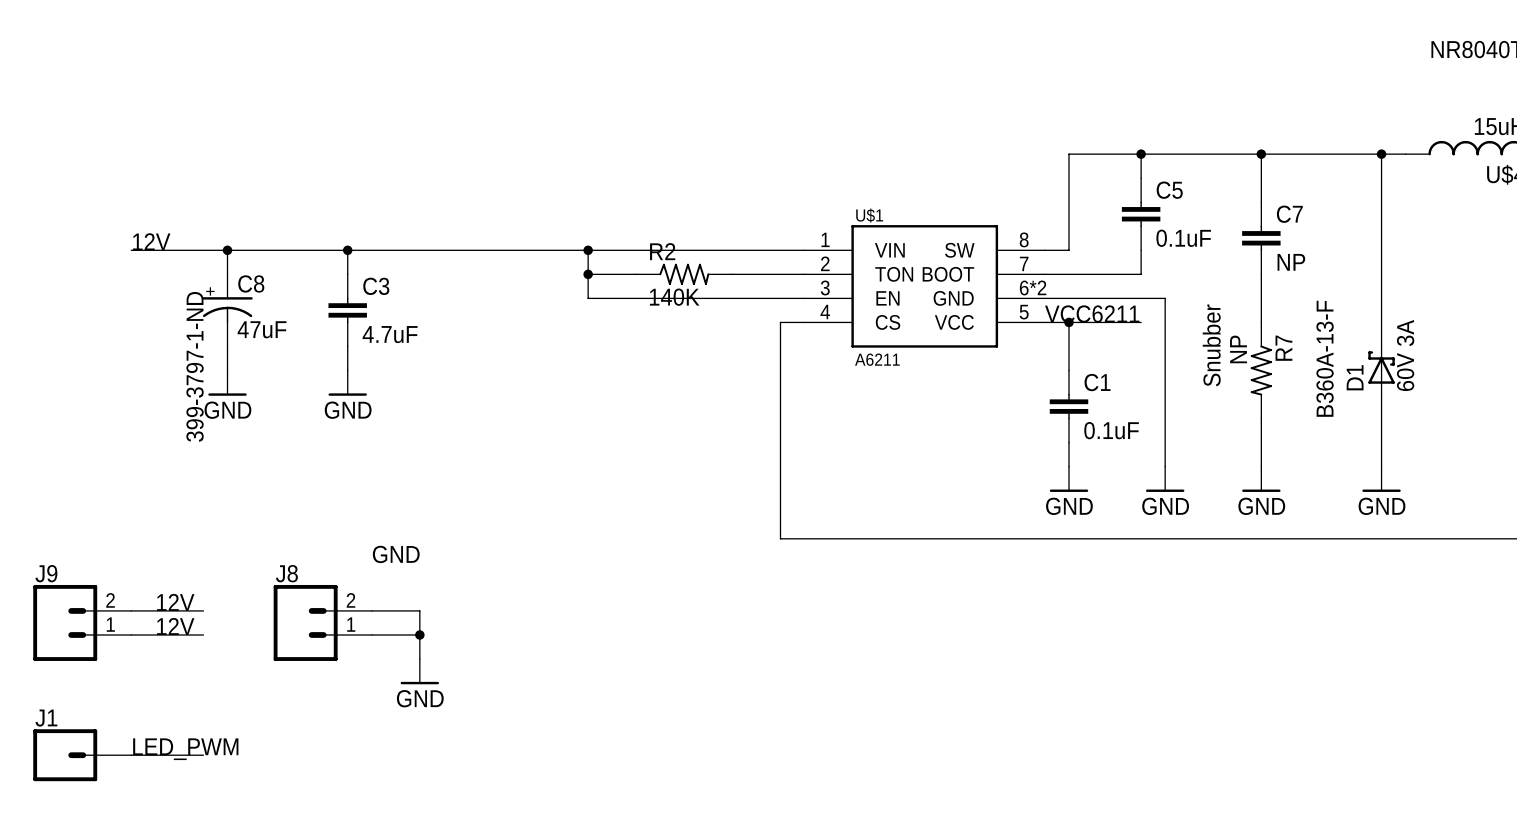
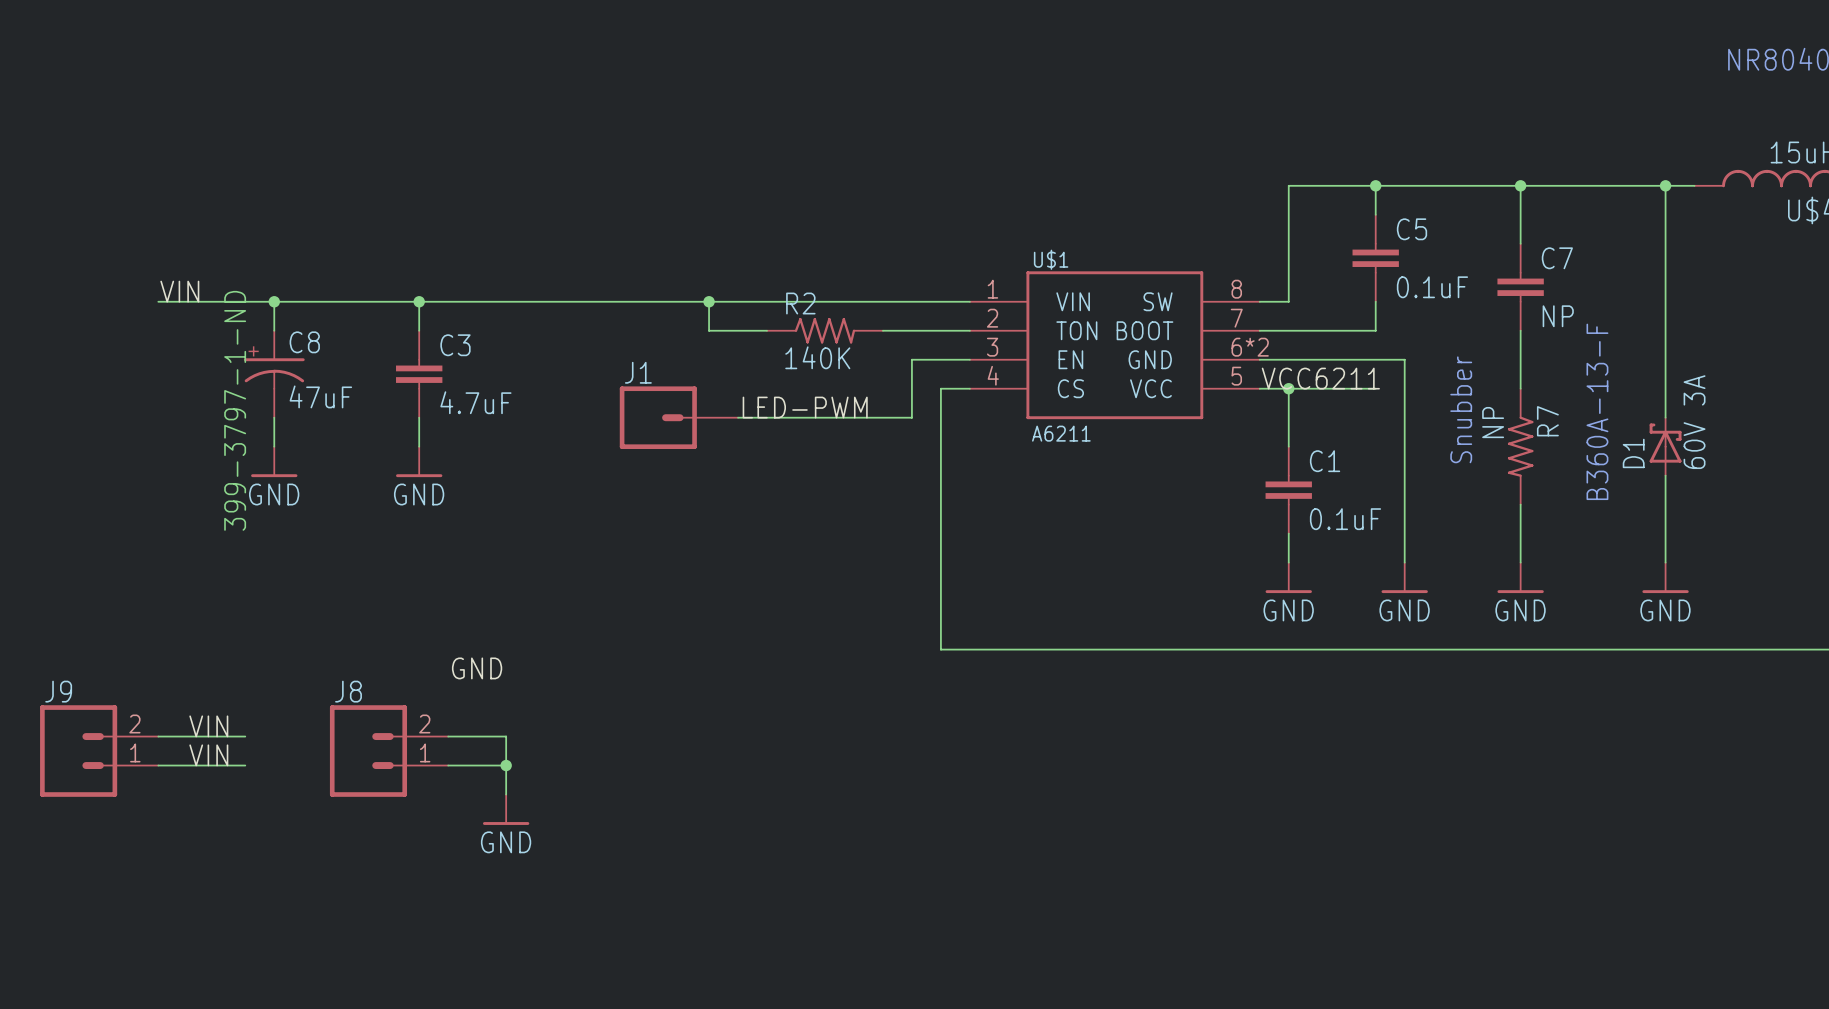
label: 12V (151, 241) -> VIN (179, 291)
wire: (588, 274) (588, 298) (756, 298) -> (738, 417) (911, 417) (911, 359)
junction: (588, 274) -> none
label: none -> LED-PWM (805, 407)
label: 12V (175, 602) -> VIN (208, 726)
label: 12V (175, 626) -> VIN (208, 755)
label: LED_PWM (185, 749) -> none
J1 position: (82, 755) -> (678, 417)
wire: (131, 755) (203, 755) -> none

